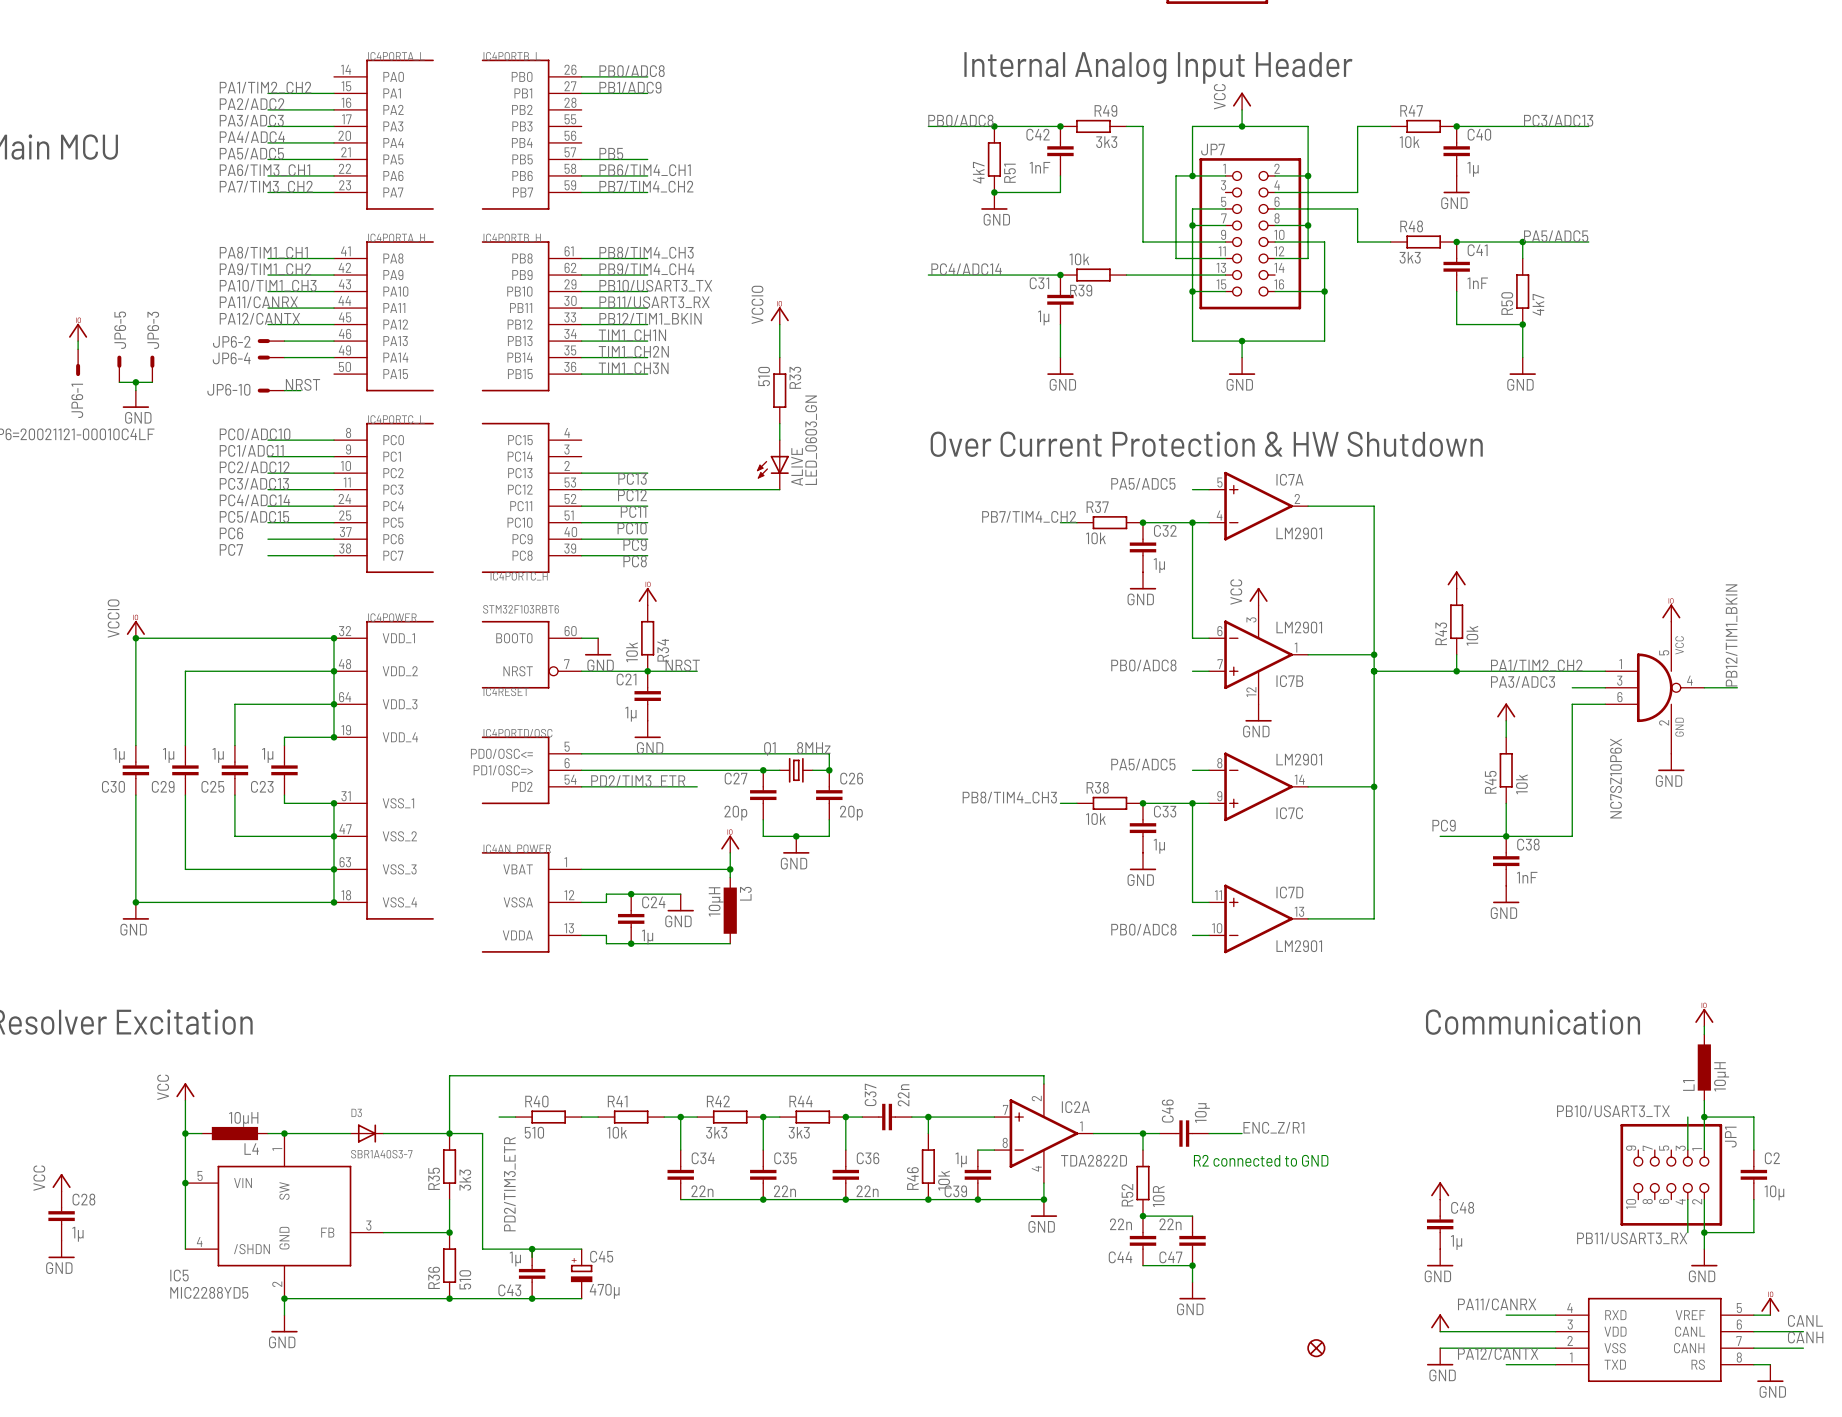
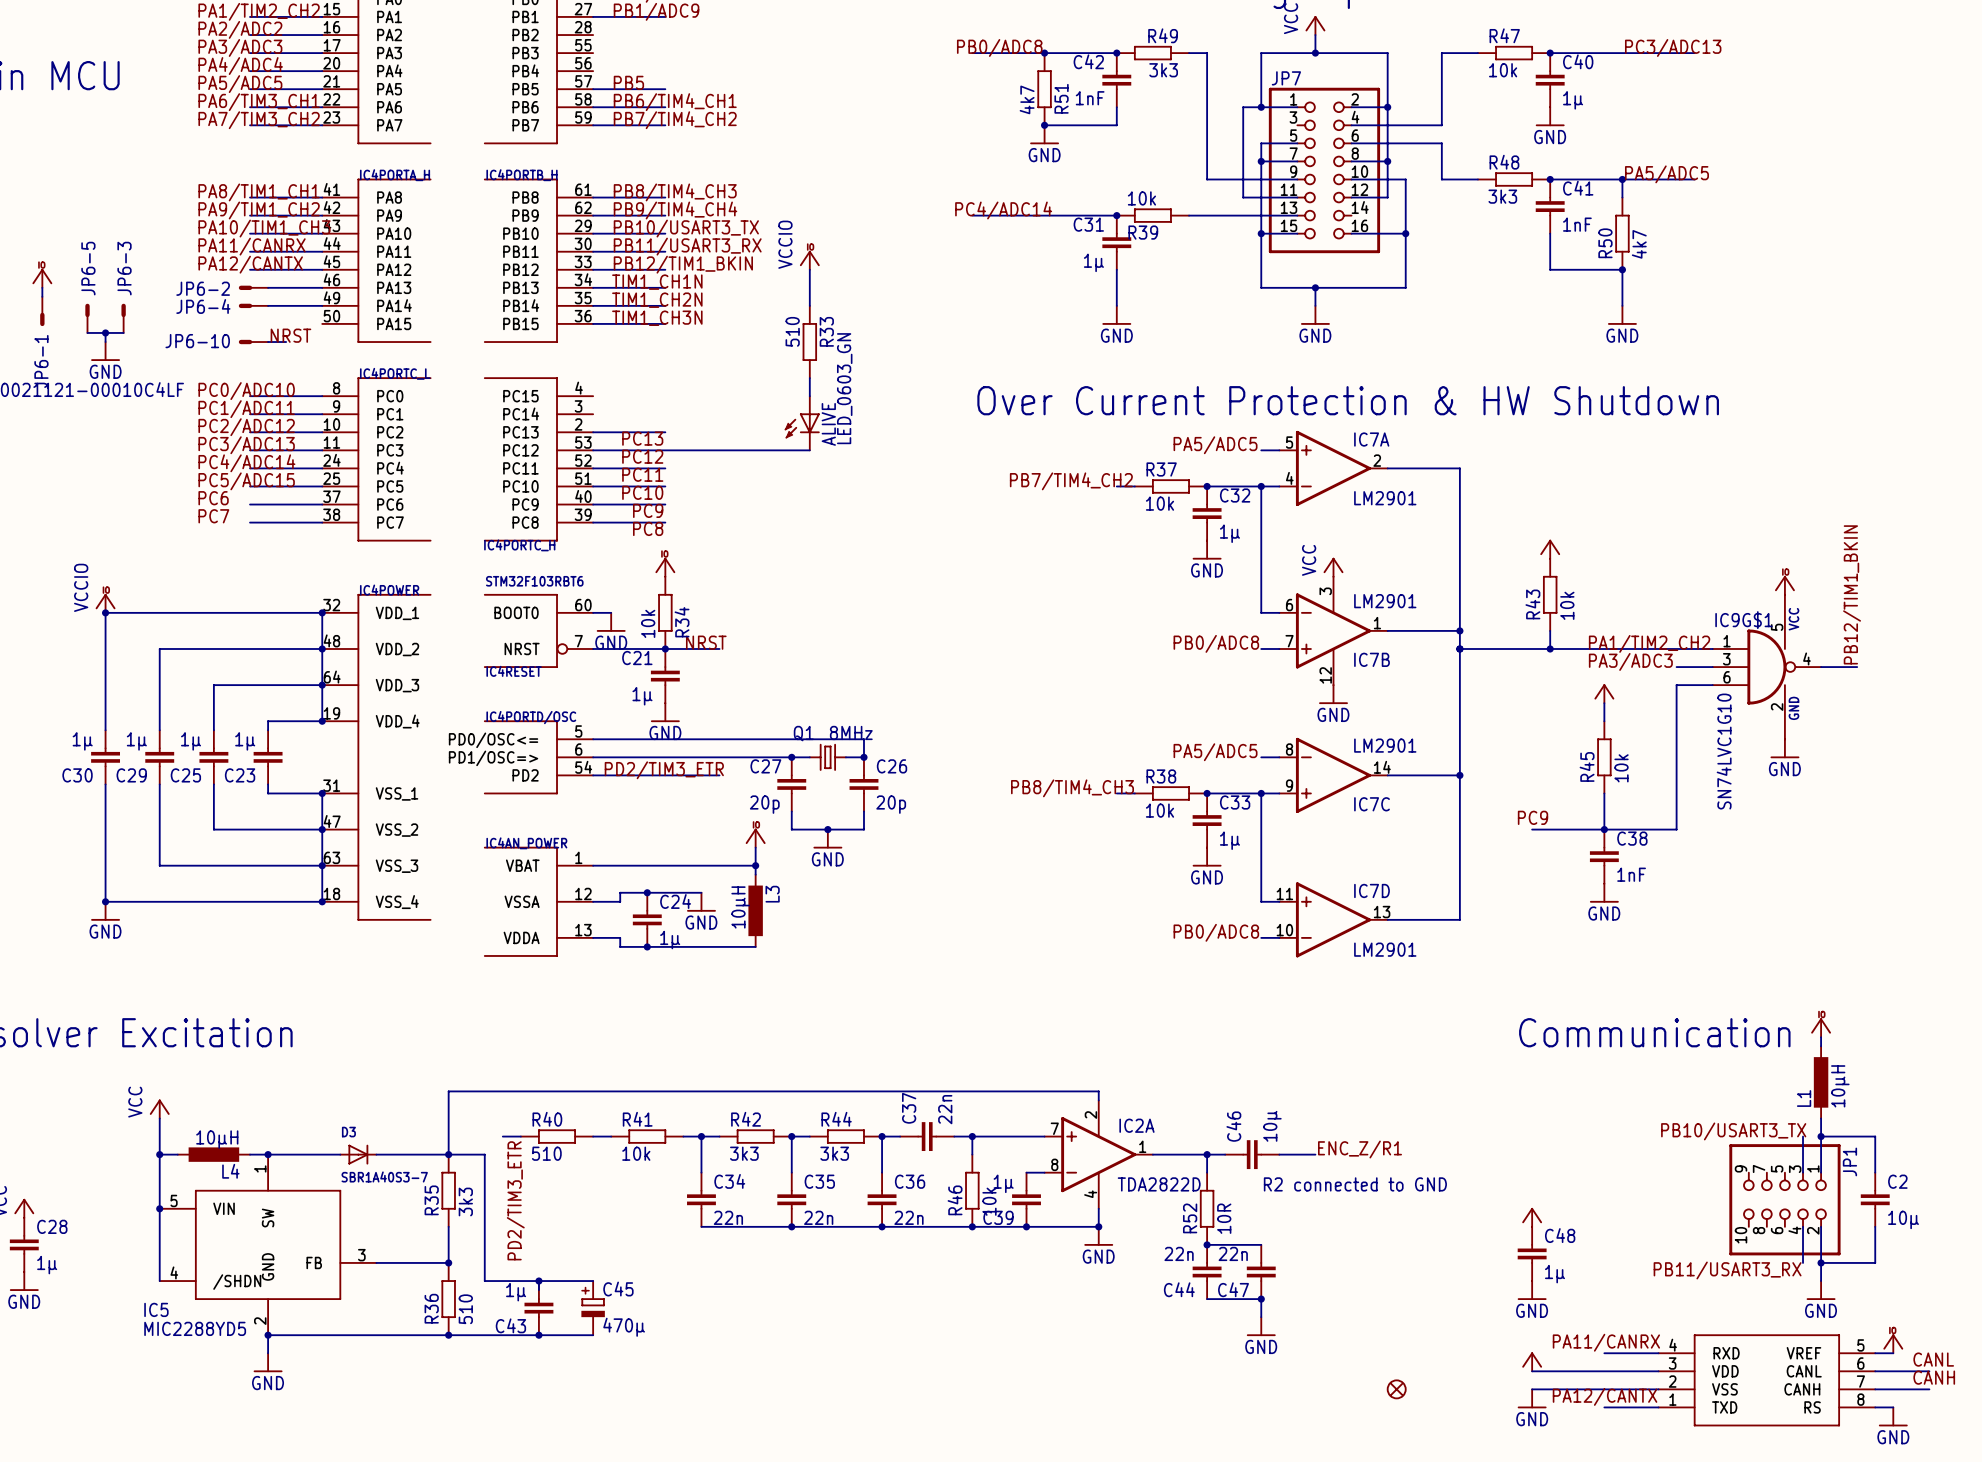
IC9G$1 name: none -> IC9G$1 (1743, 620)
IC9G$1 value: NC7SZ10P6X (1616, 778) -> SN74LVC1G10 (1724, 751)

